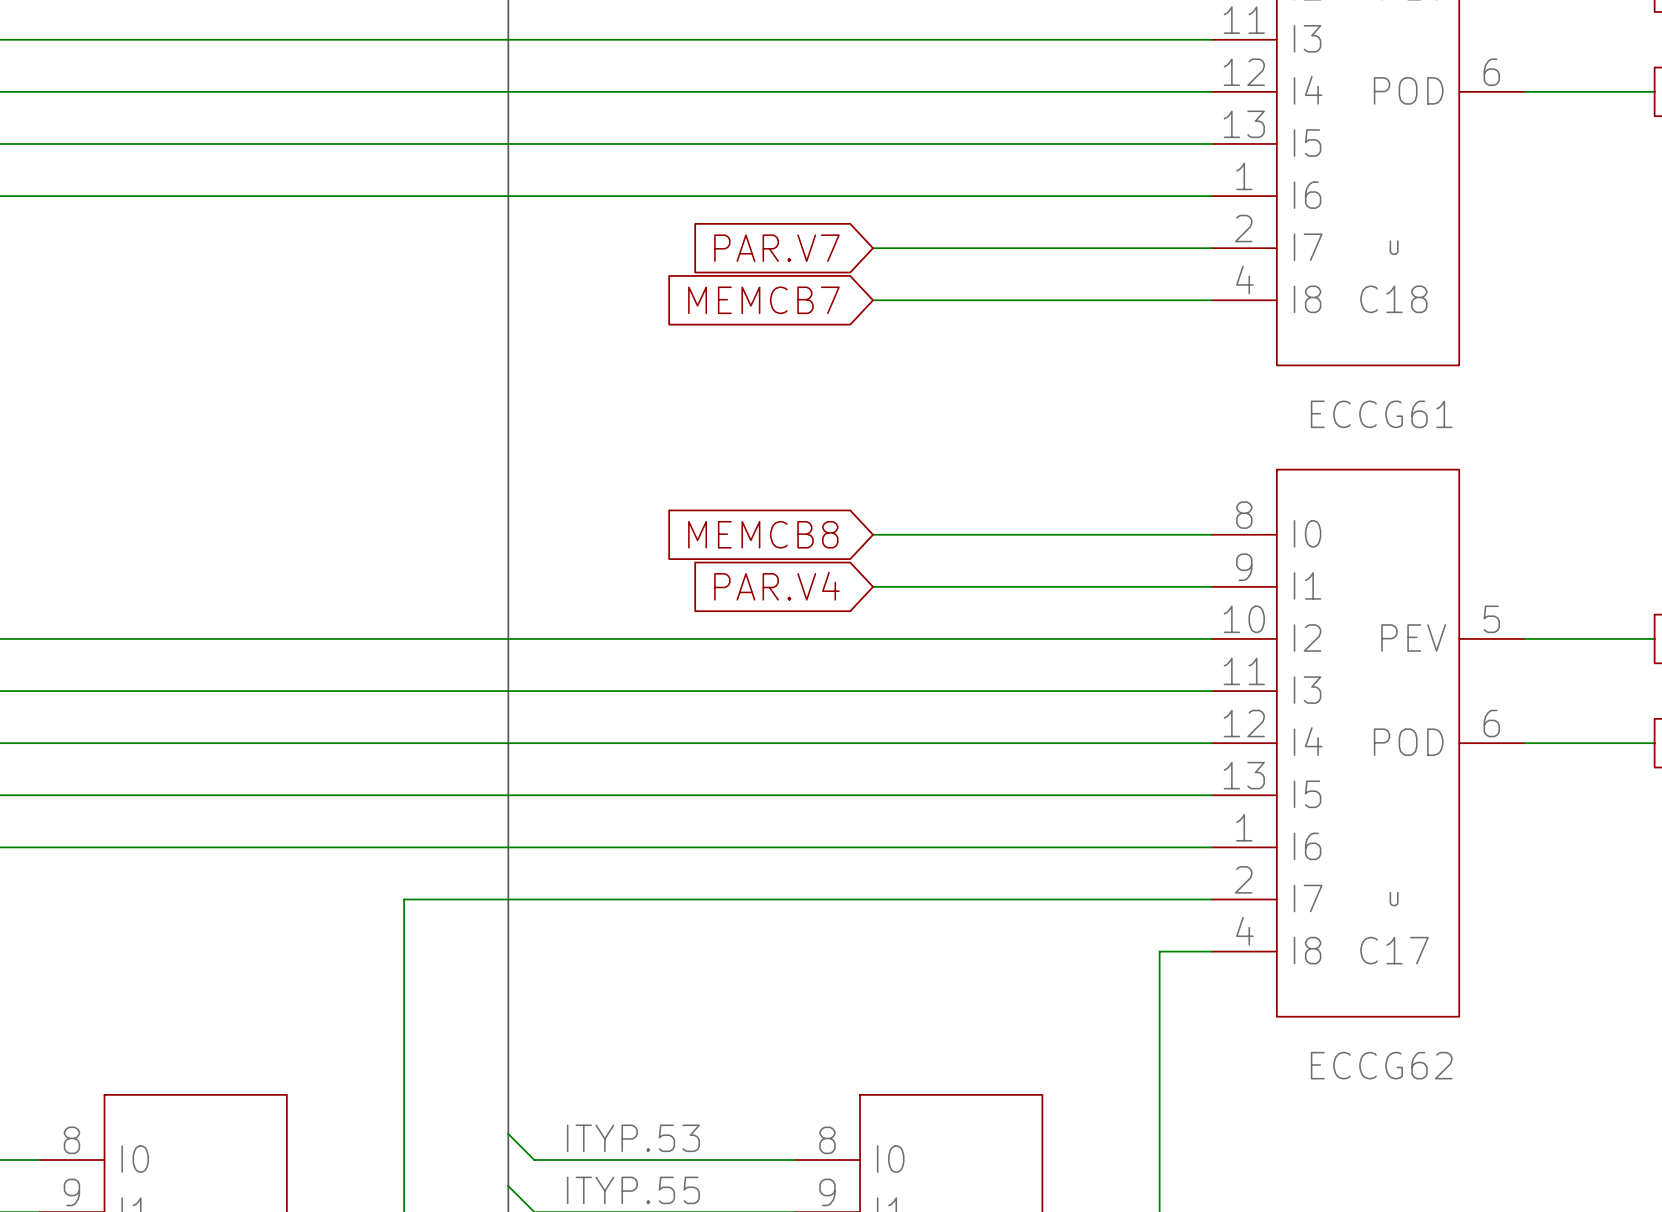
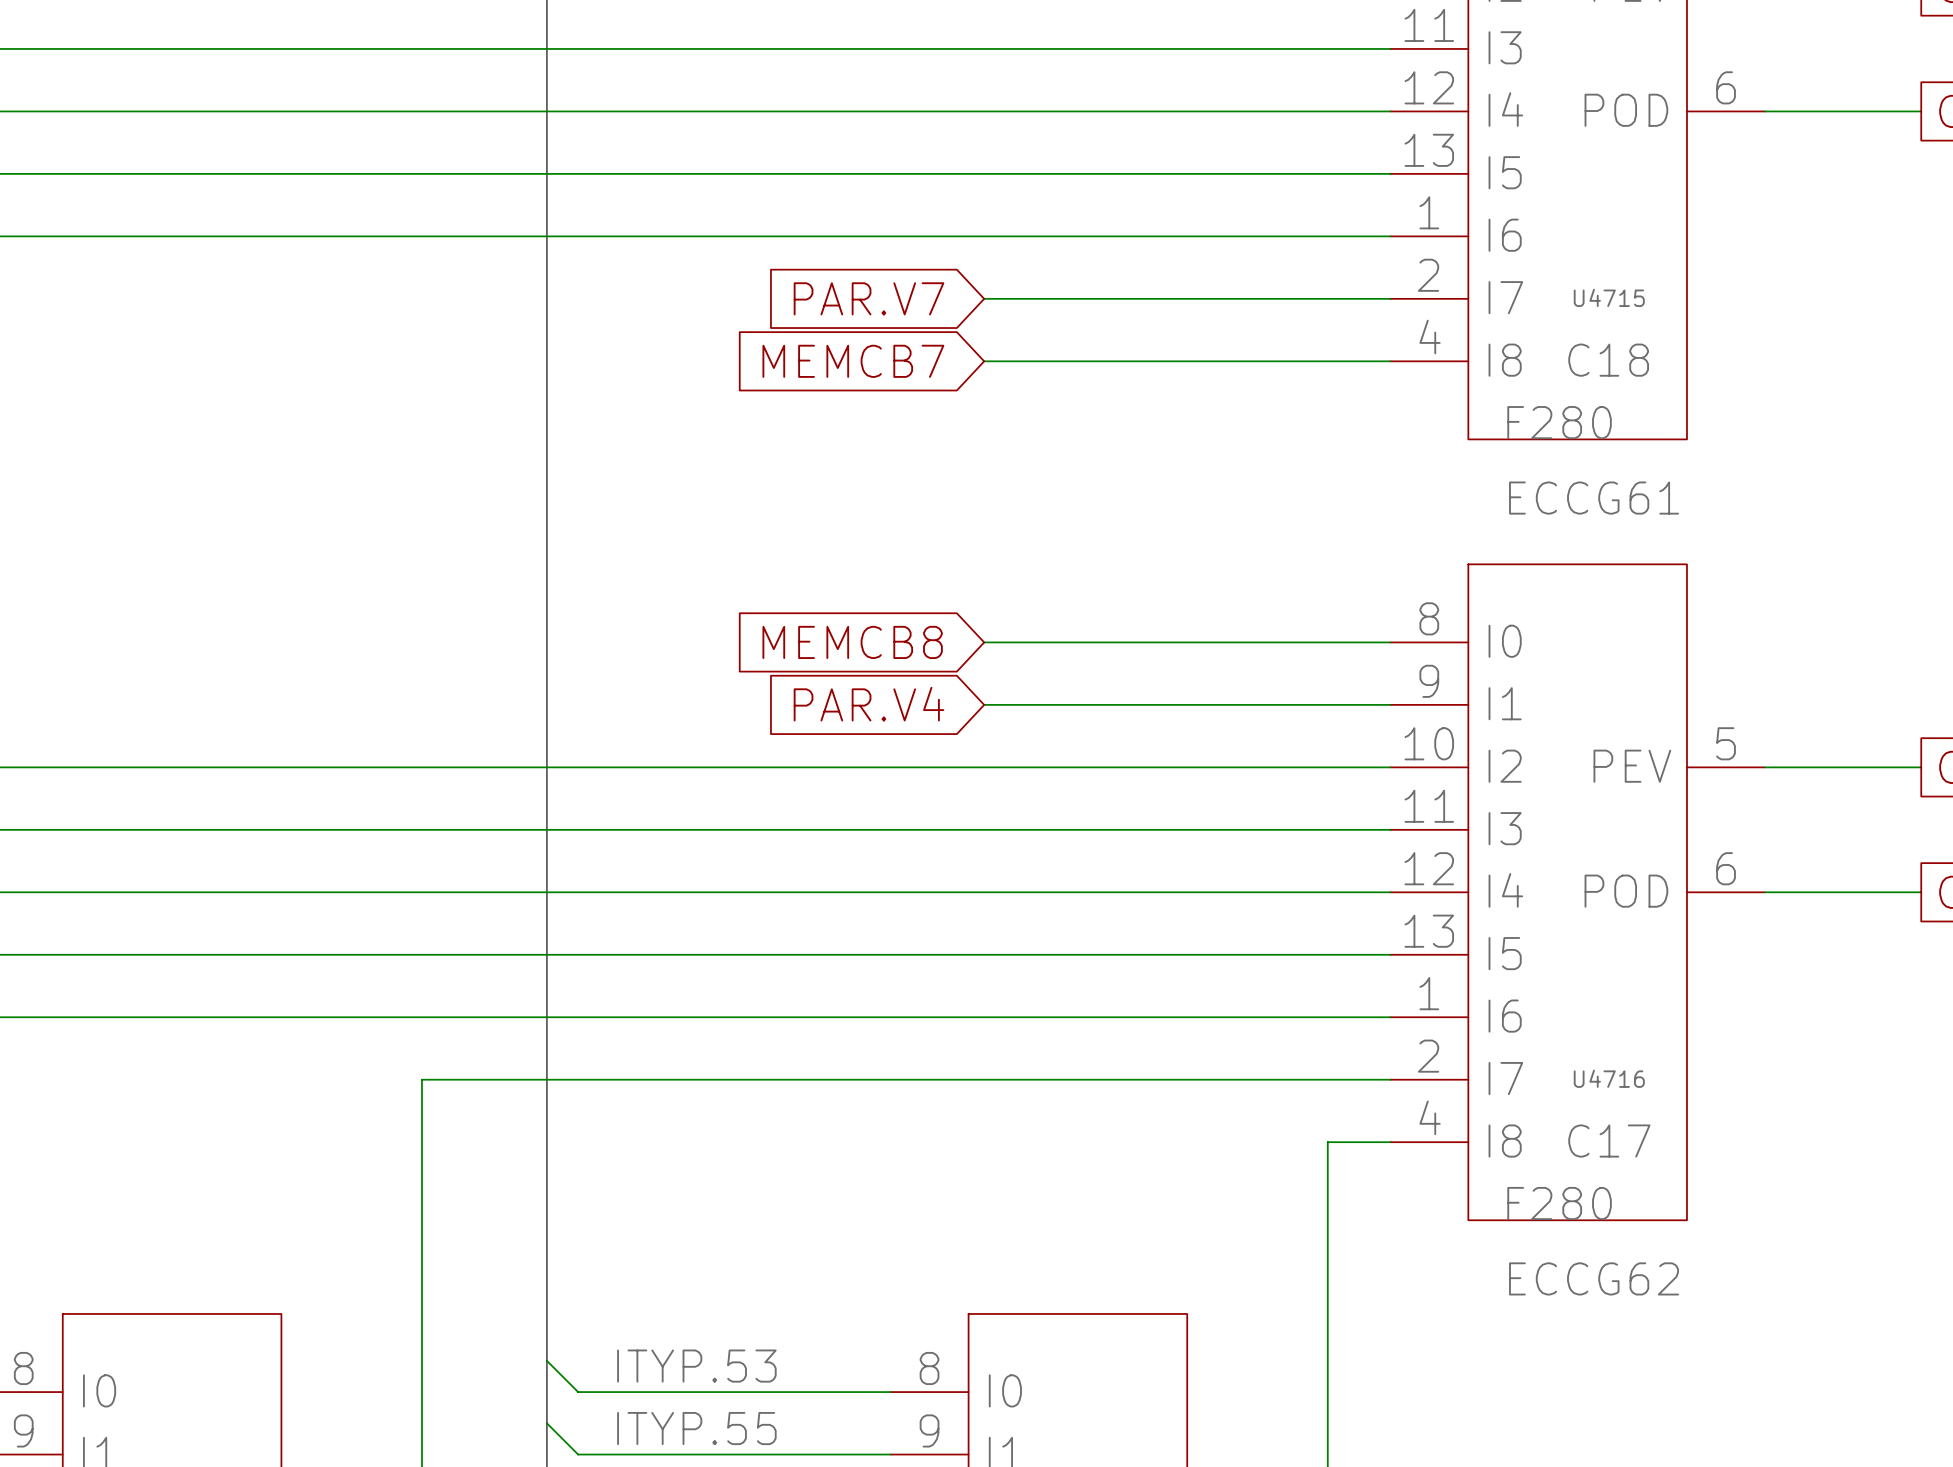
U name: U (1394, 247) -> U4715 (1609, 297)
U value: none -> F280 (1559, 422)
U name: U (1394, 899) -> U4716 (1609, 1078)
U value: none -> F280 (1559, 1203)

